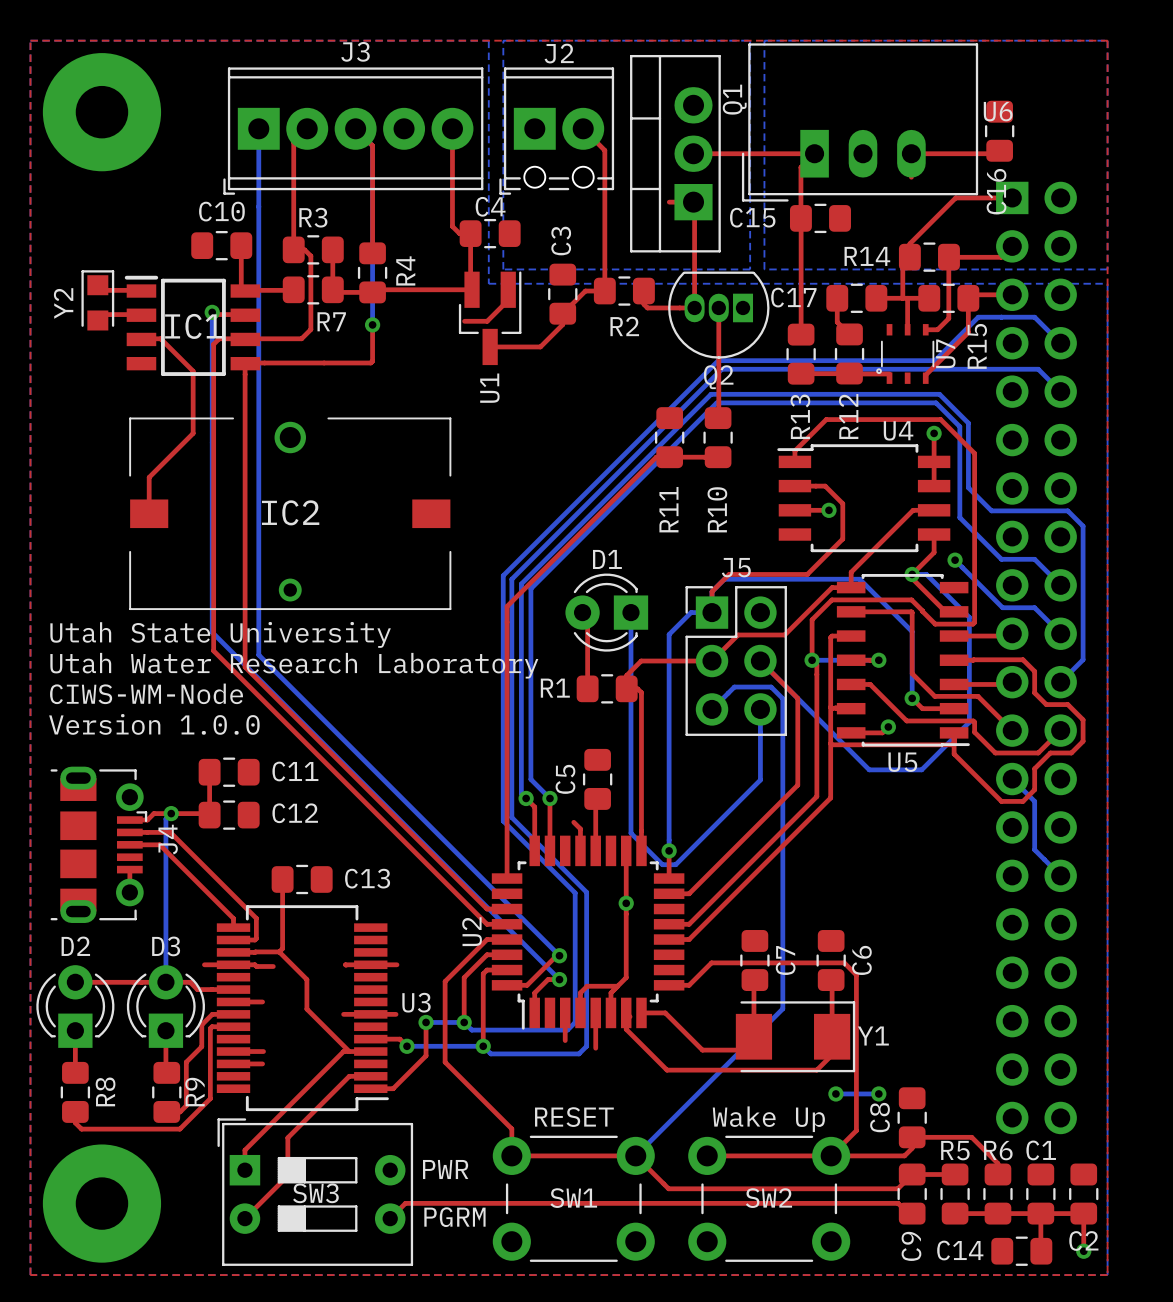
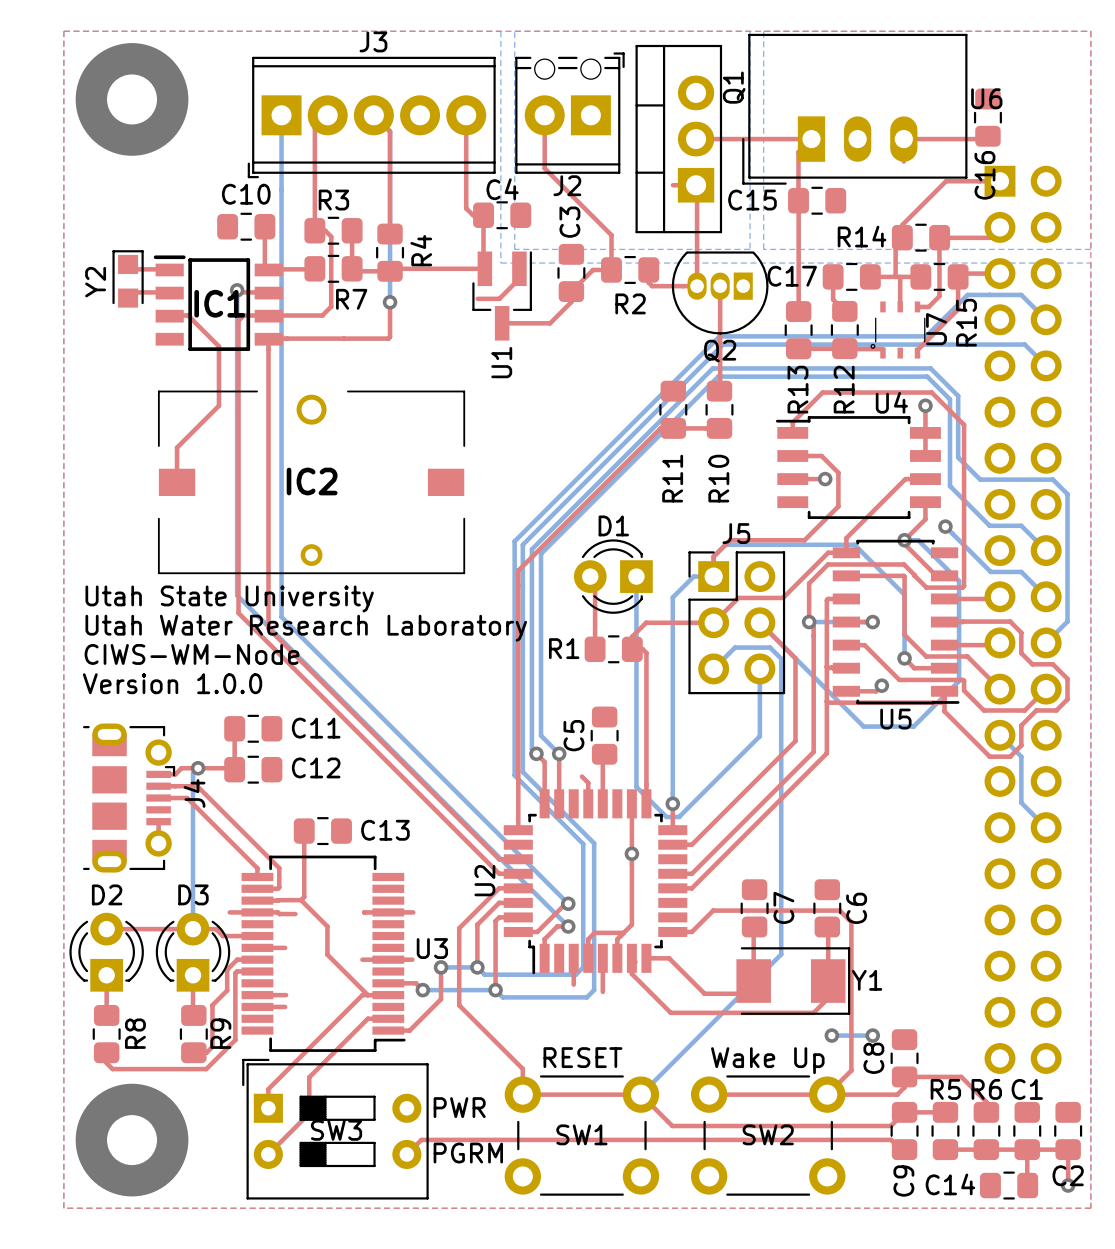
top track: (583, 128) (604, 150) (604, 254) -> (544, 115) (544, 168) (611, 235)
J2 rotation: 0° (556, 131) -> 180° (569, 113)

